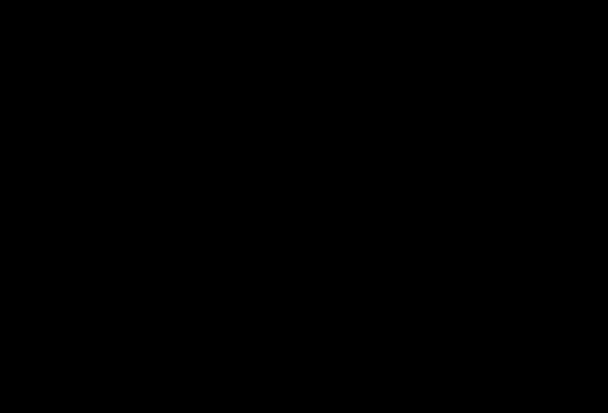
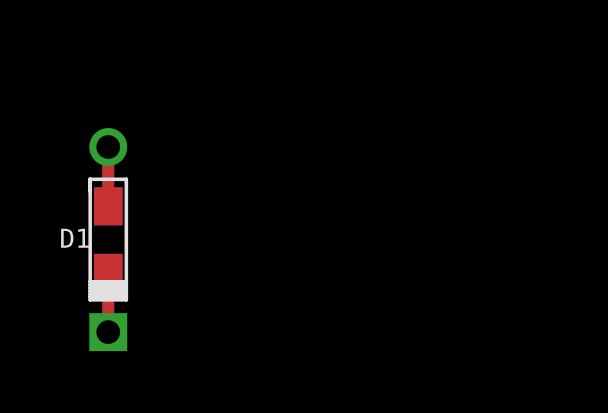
D1: none -> (108, 239)

